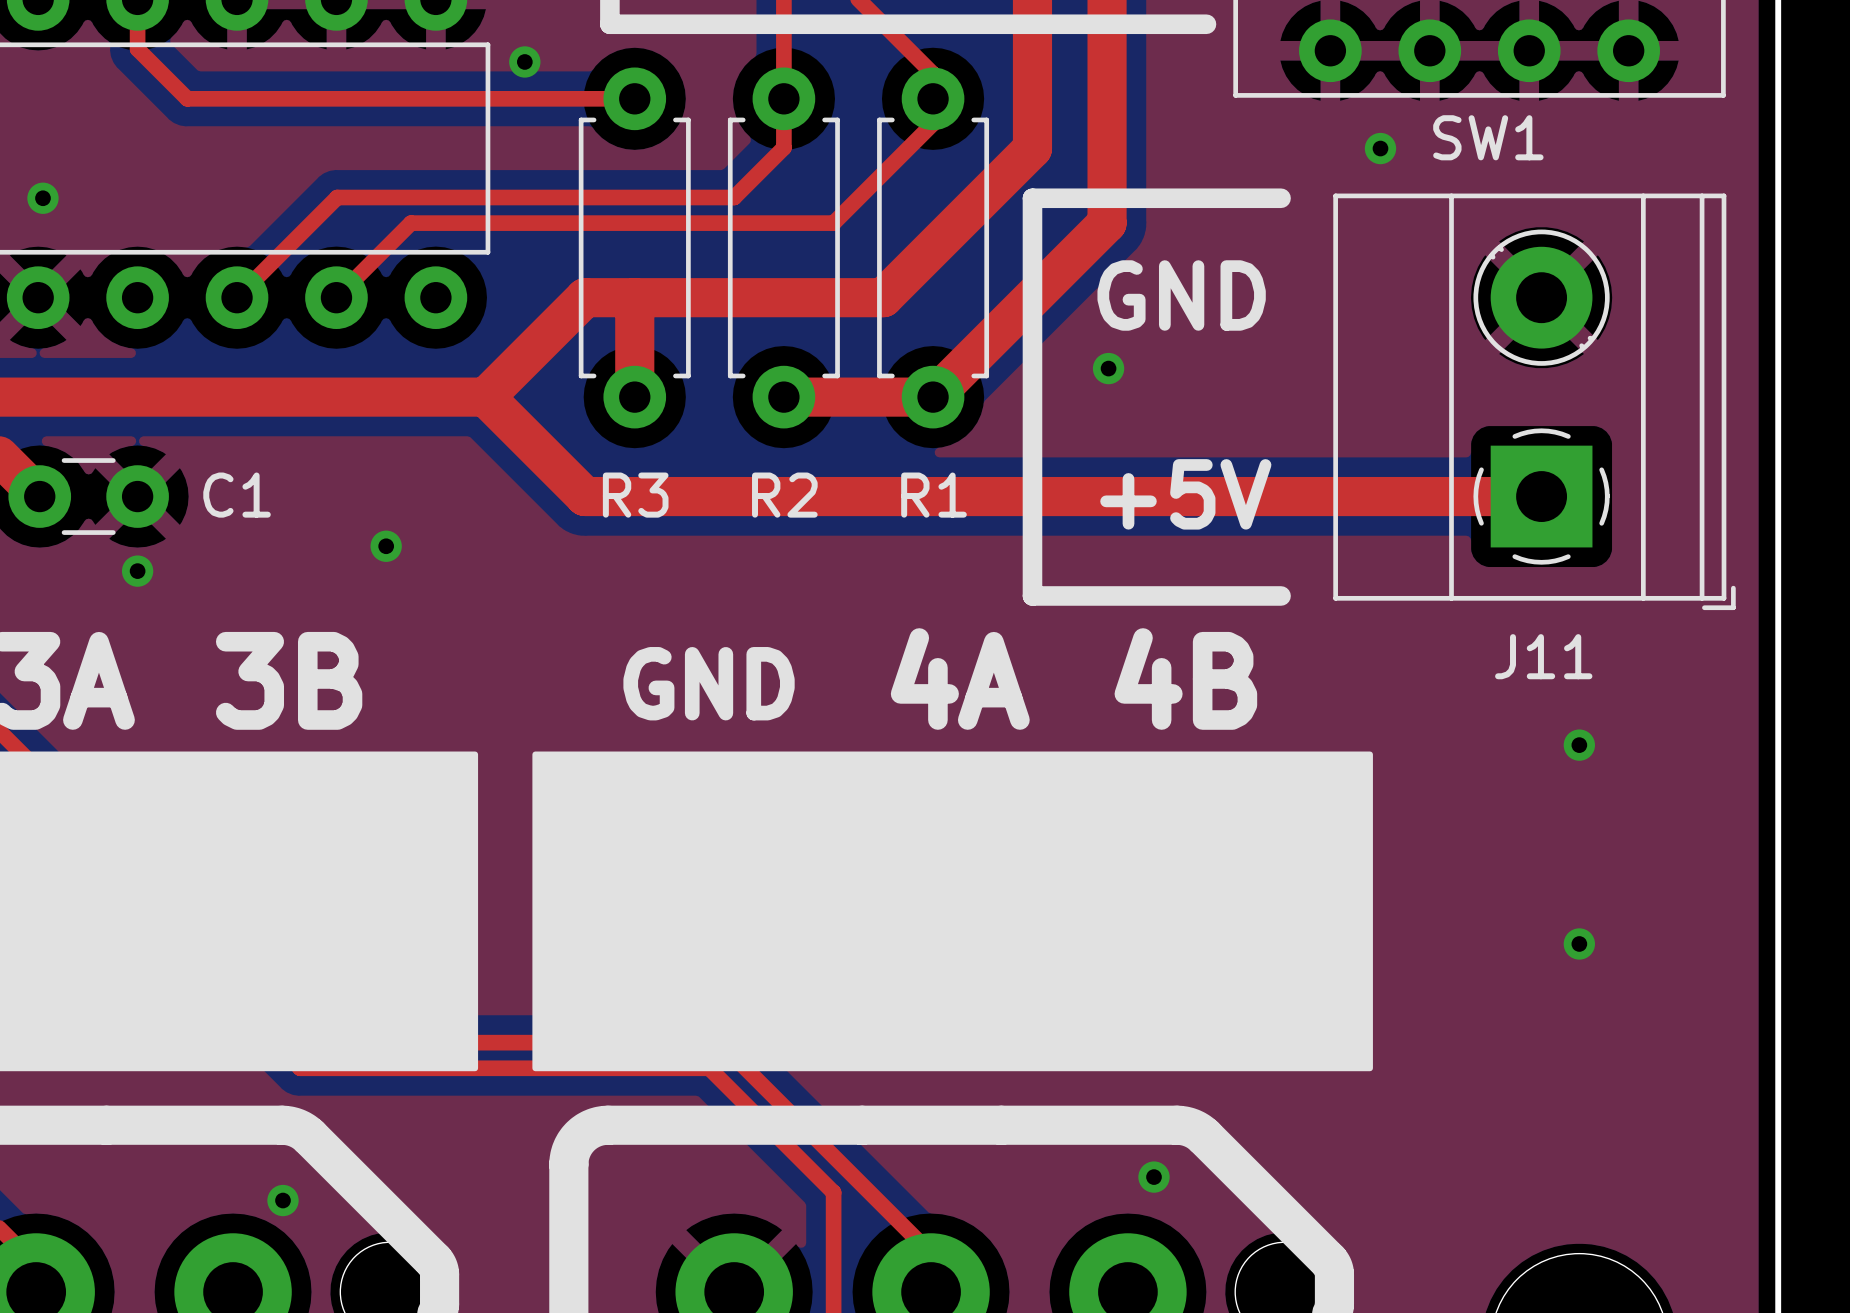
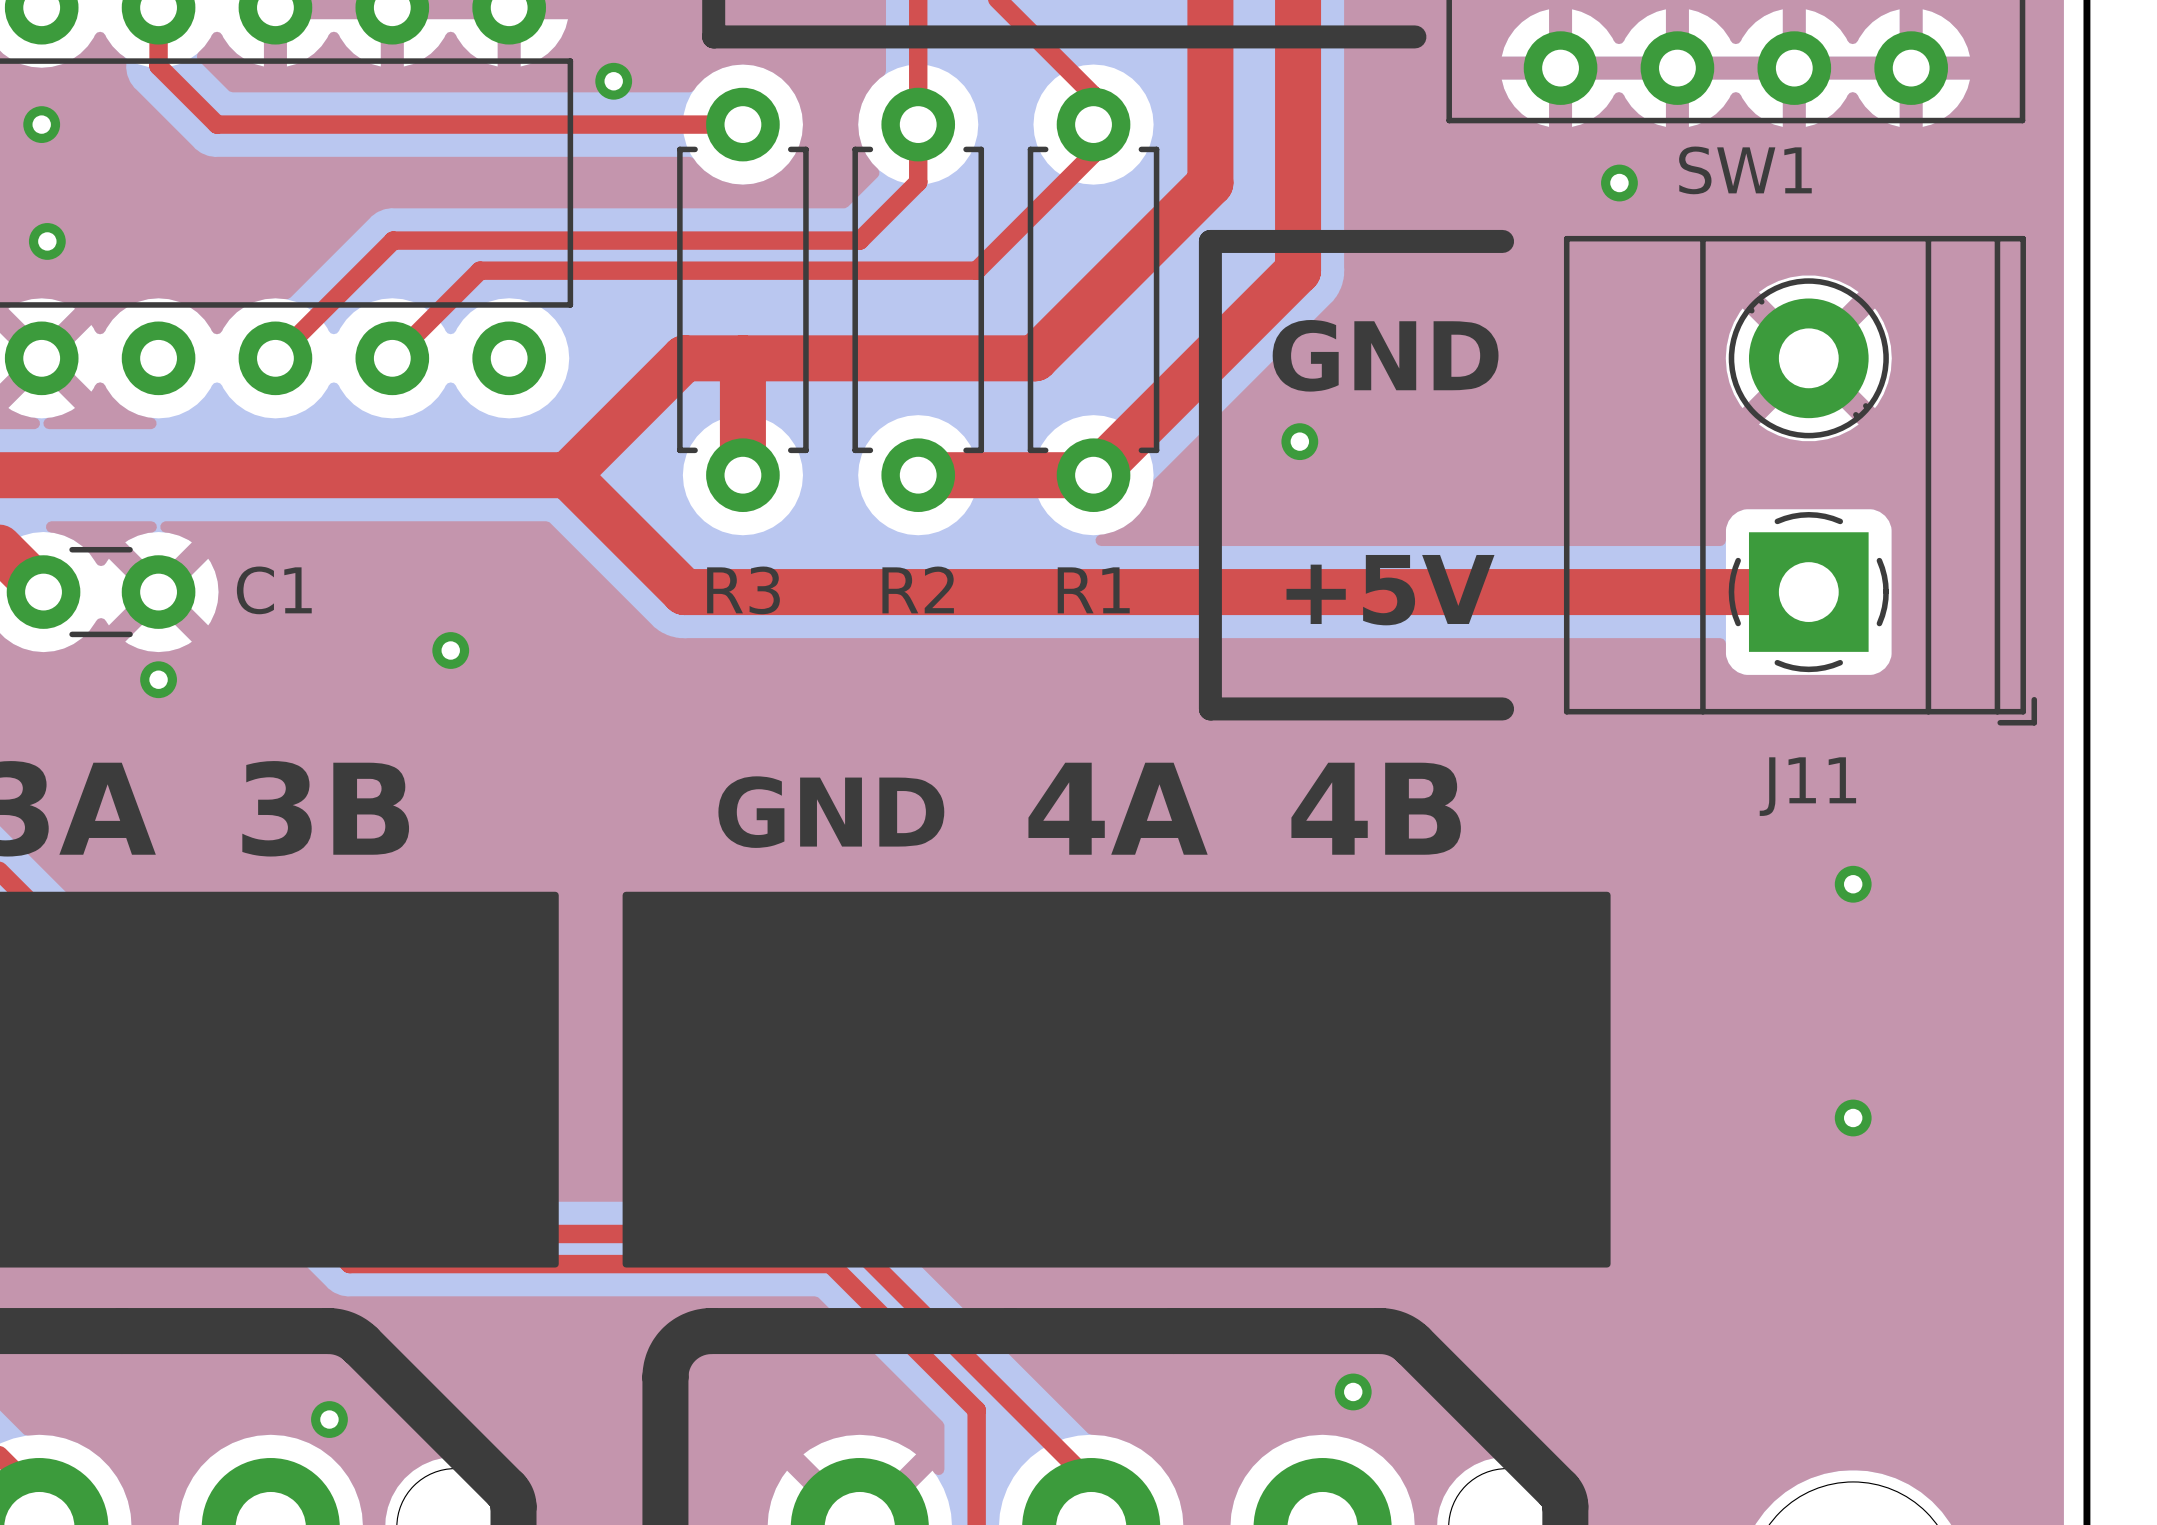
via: none -> (41, 124)

